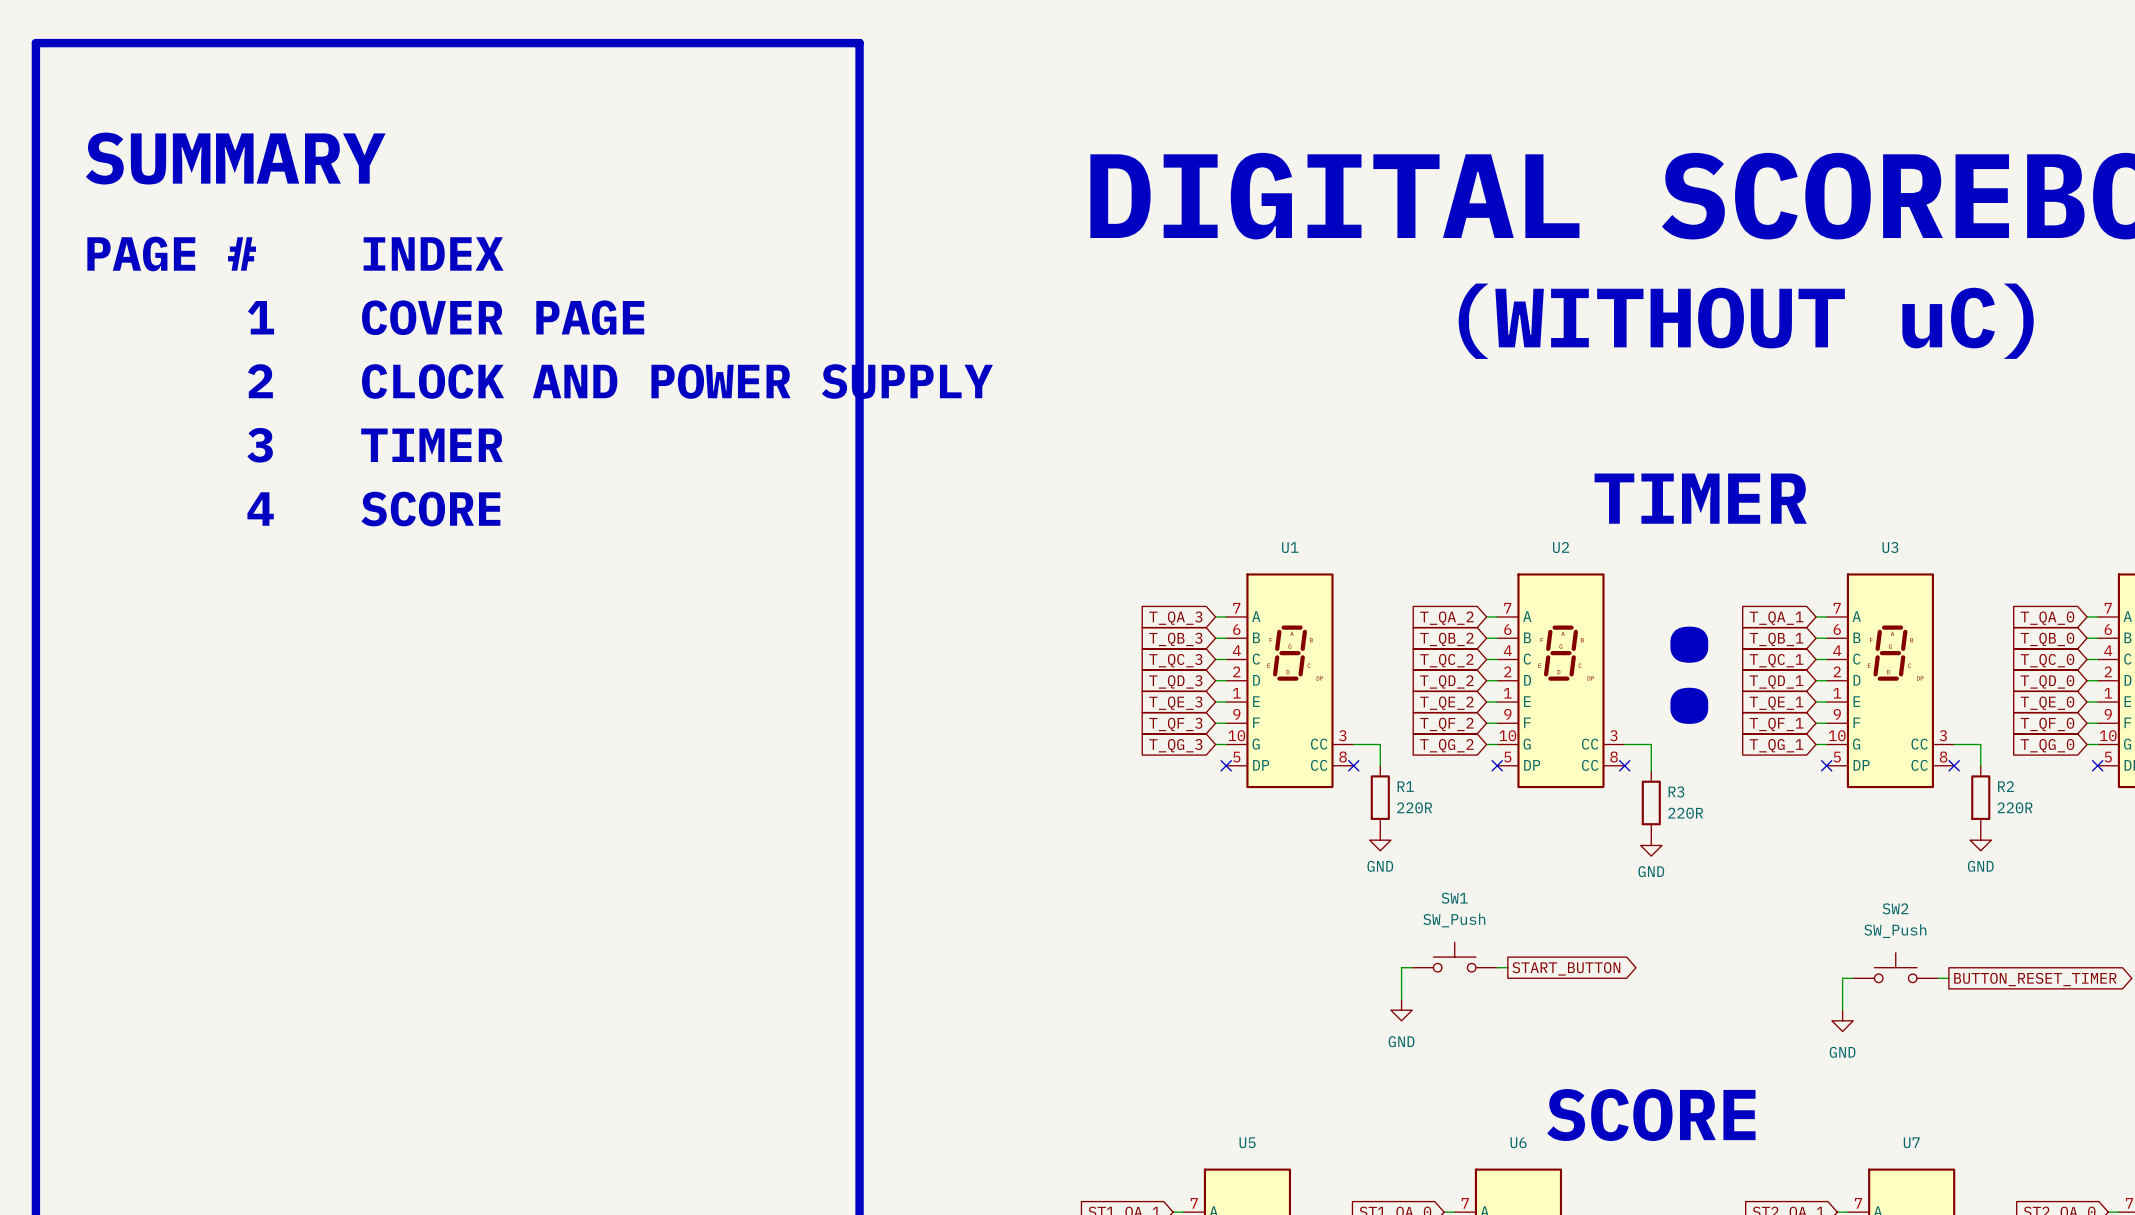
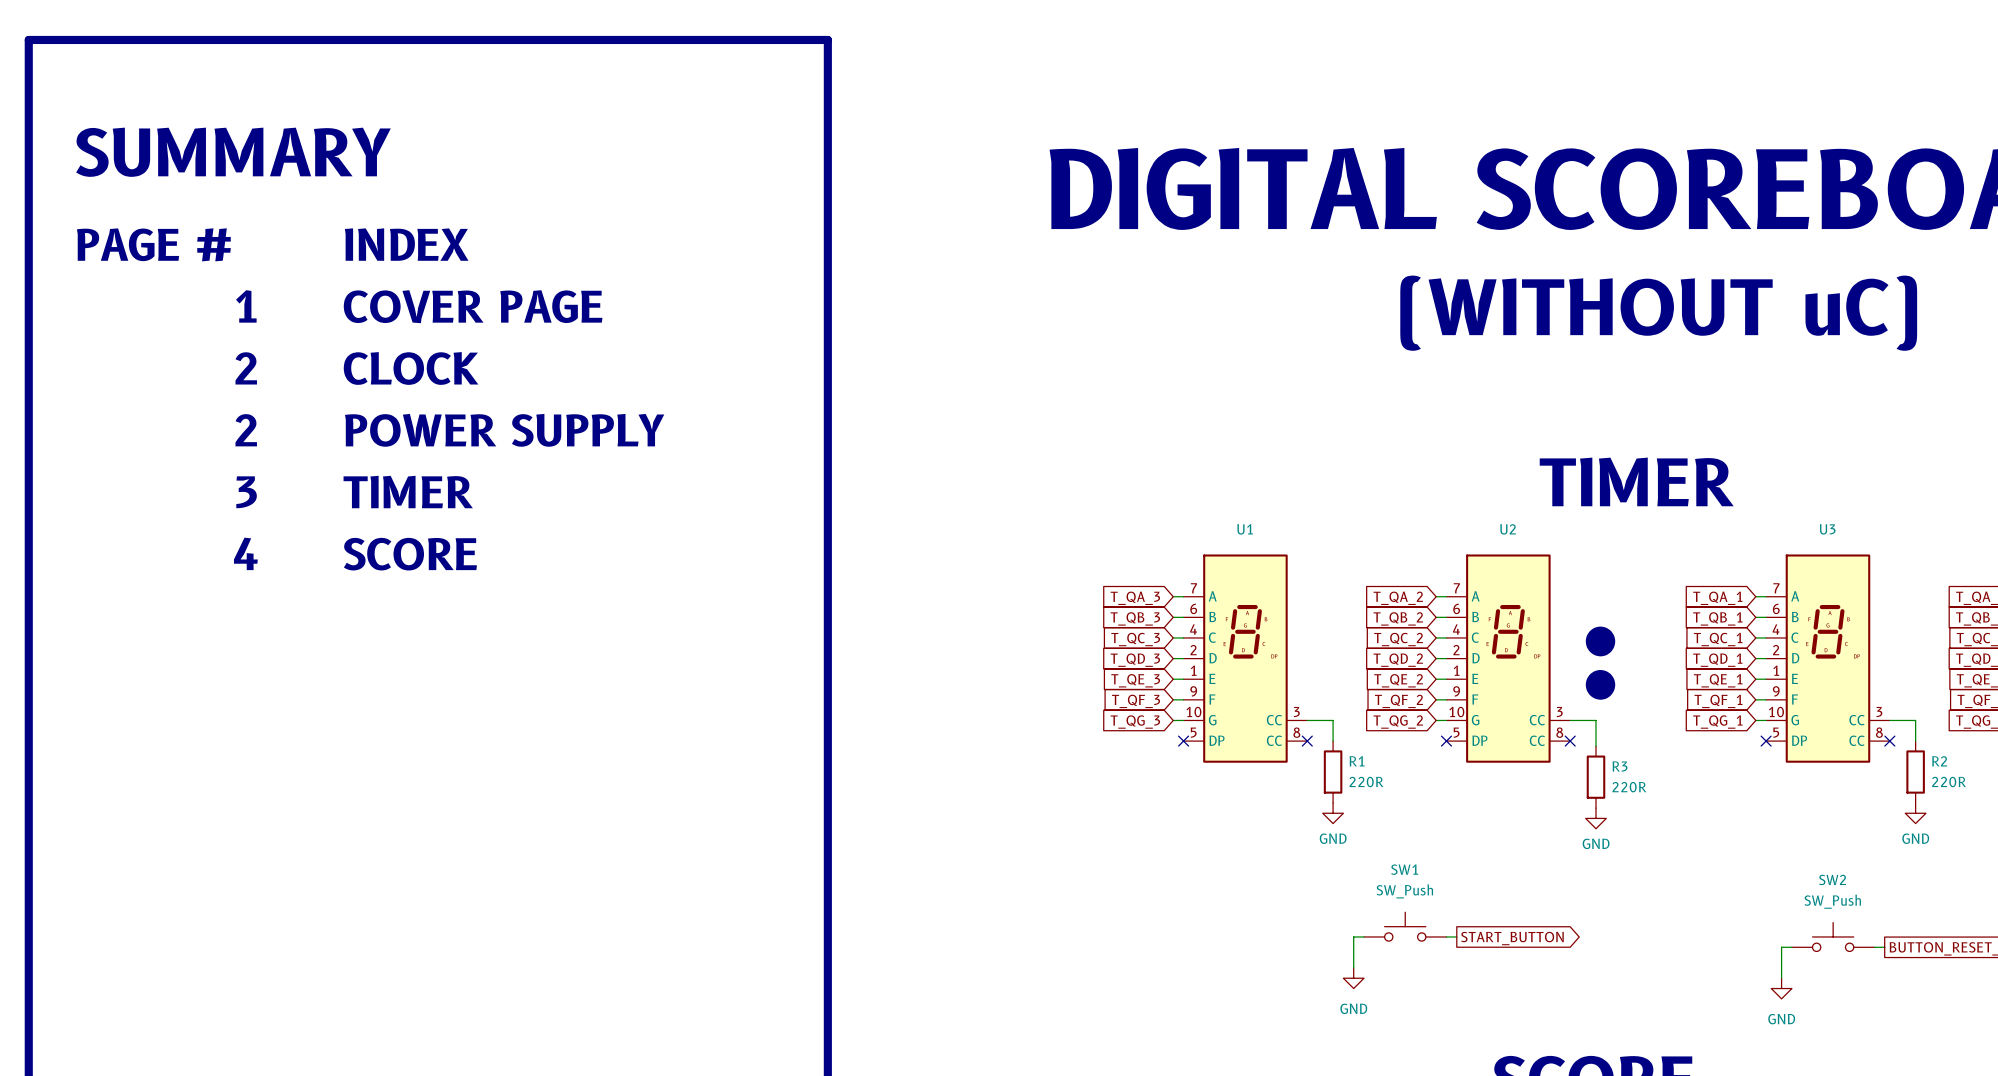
text: CLOCK AND POWER SUPPLY (677, 381) -> CLOCK (411, 368)
text: 3 (260, 445) -> 2 (246, 430)
text: TIMER (431, 445) -> POWER SUPPLY (504, 430)
text: 4 (260, 509) -> 3 (246, 492)
text: SCORE (430, 509) -> TIMER (408, 492)
text: none -> 4 (245, 553)
text: none -> SCORE (410, 554)

